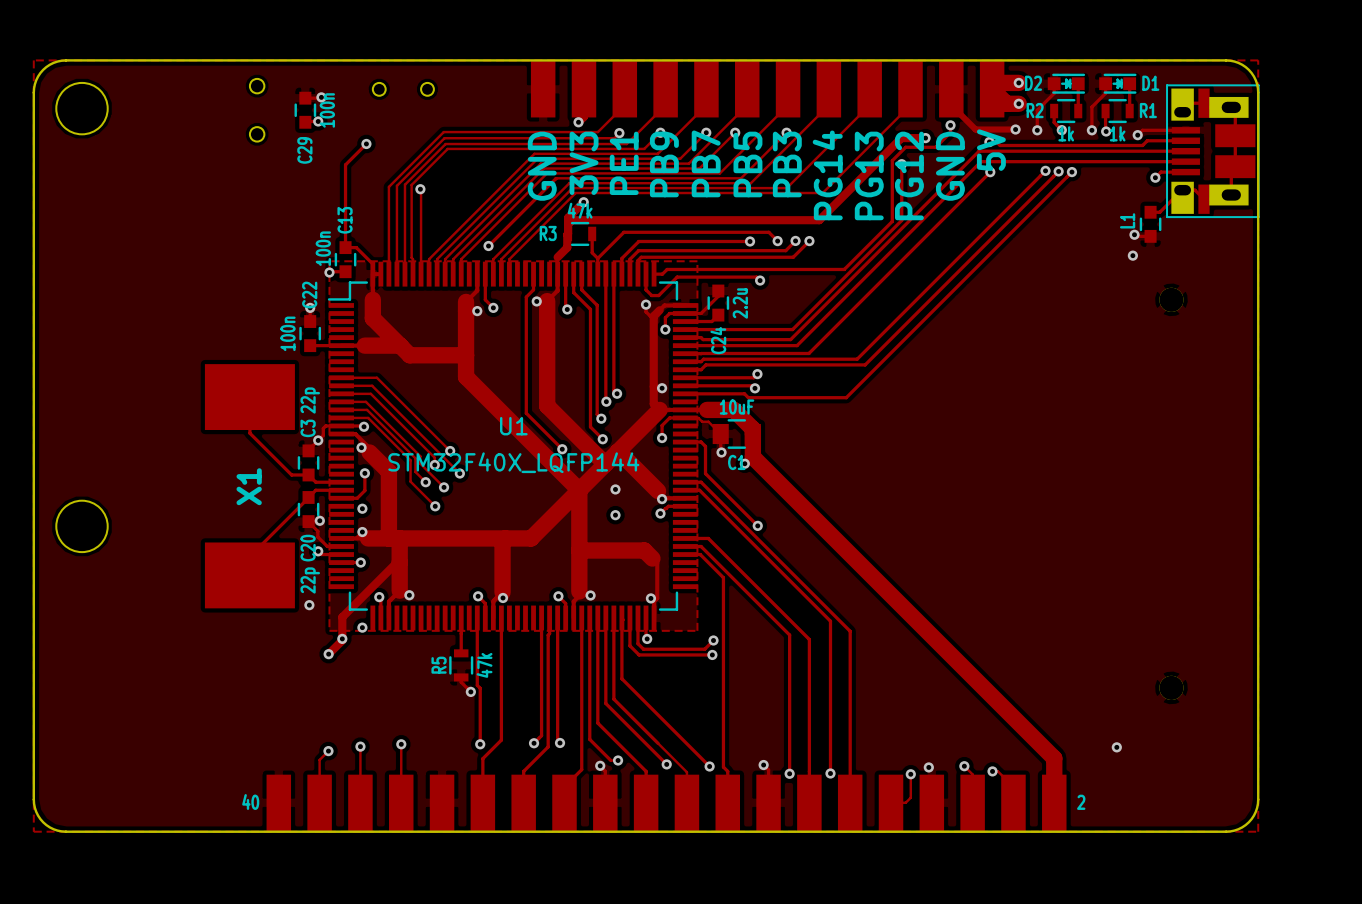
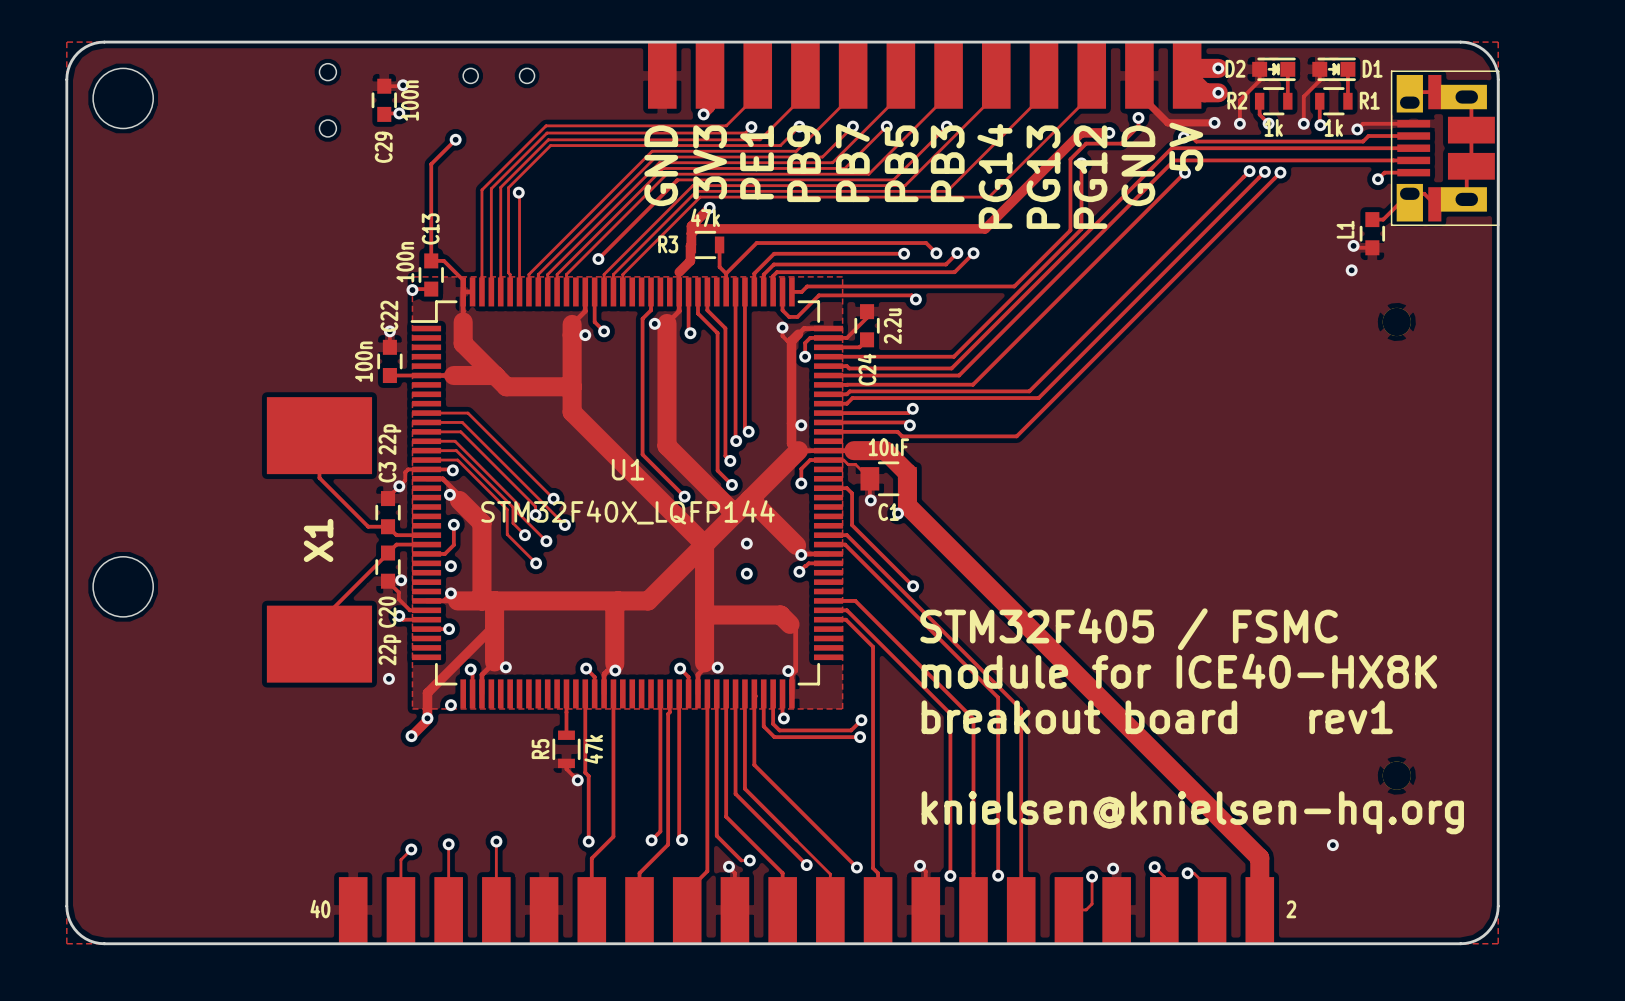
text: none -> STM32F405 / FSMC (1129, 629)
text: none -> module for ICE40-HX8K (1179, 671)
text: none -> breakout board rev1 (1157, 717)
text: none -> knielsen@knielsen-hq.org (1192, 812)

